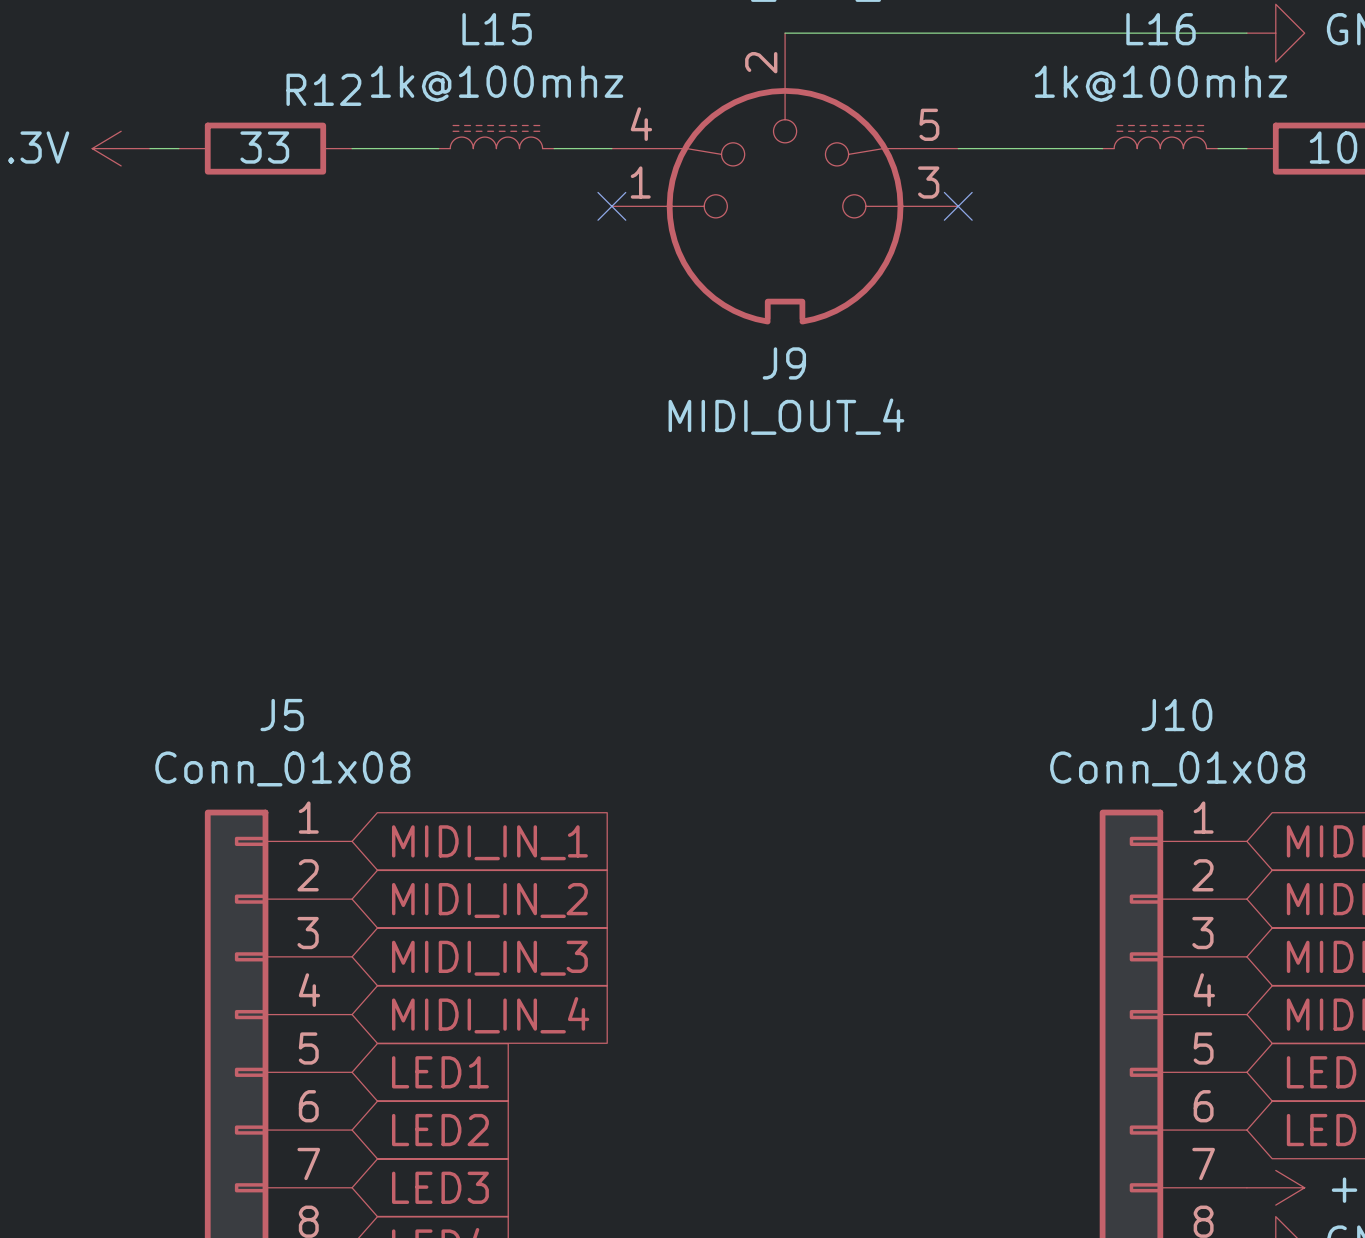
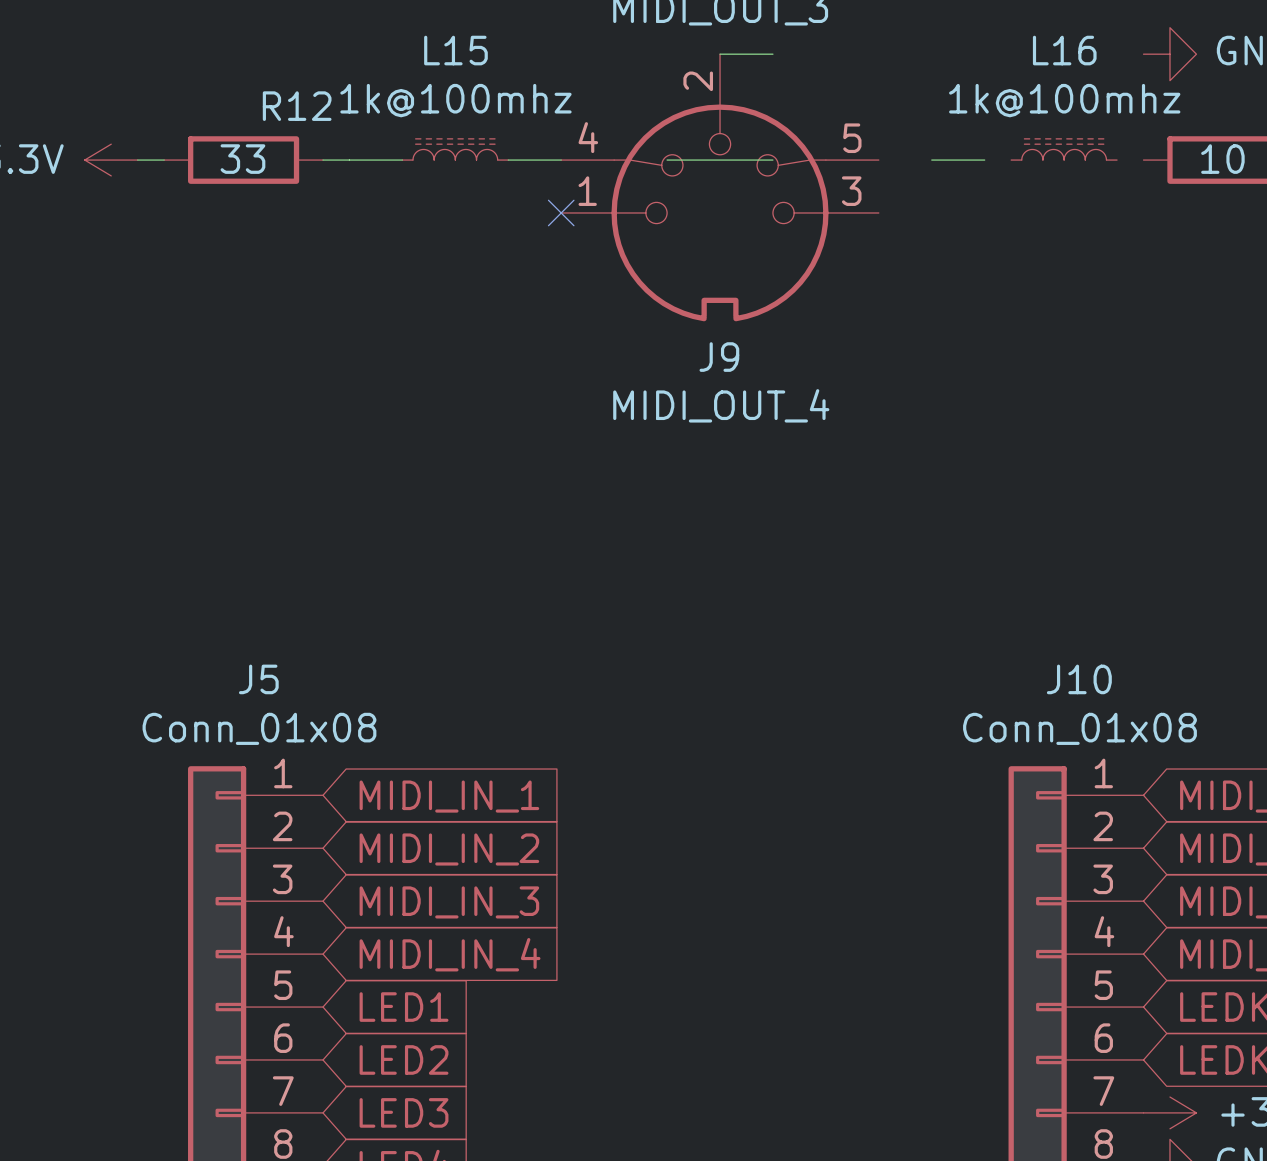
wire: (842, 33) (1246, 33) -> none
wire: none -> (667, 160) (772, 160)
wire: (958, 148) (1015, 148) -> none
wire: (1073, 148) (1102, 148) -> none
wire: (1218, 148) (1246, 148) -> none
no-connect mark: (958, 206) -> none

